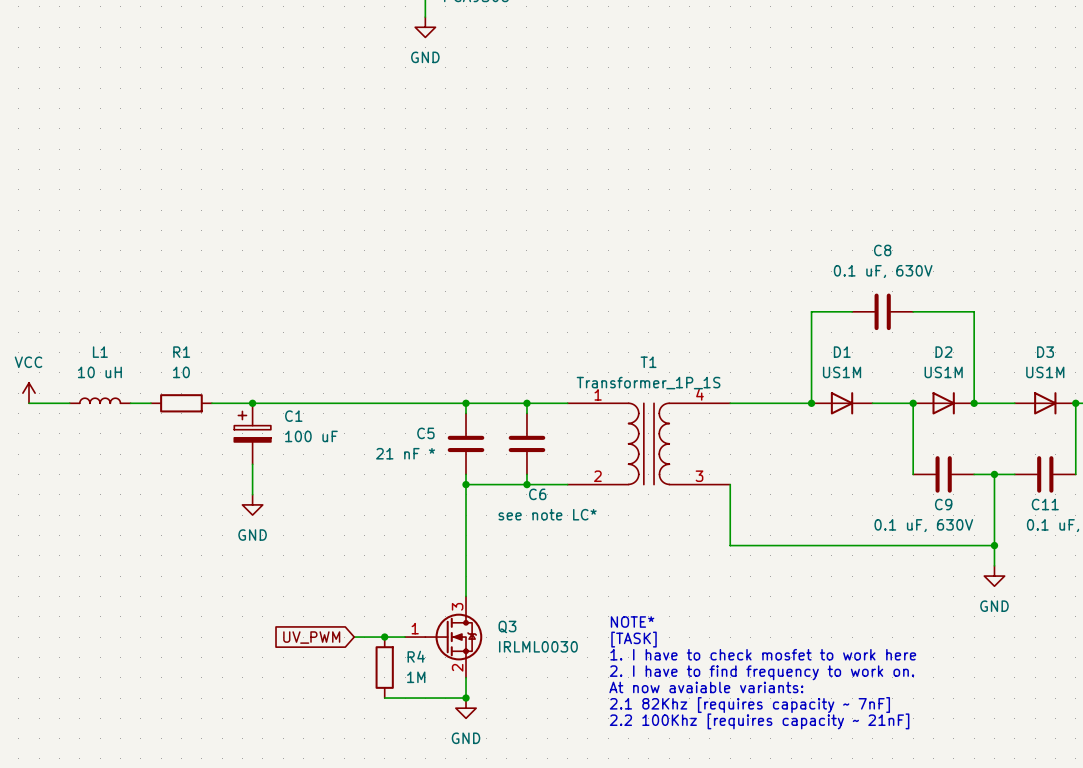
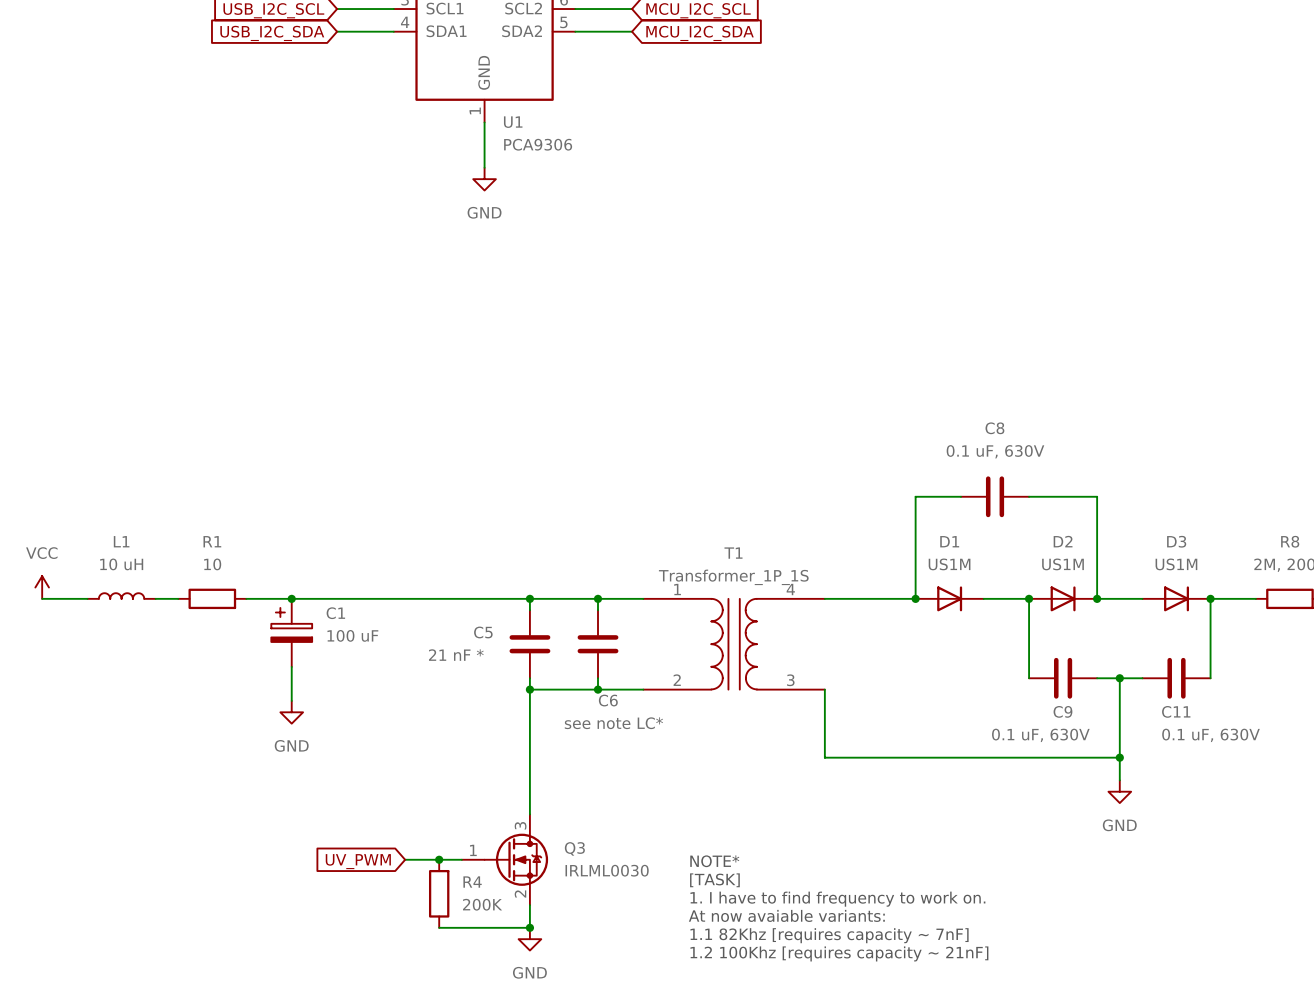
text: NOTE* (632, 622) -> none
text: [TASK] (634, 639) -> NOTE* (714, 861)
text: 1. I have to check mosfet to work here (763, 654) -> [TASK] (714, 880)
text: 2. I have to find frequency to work on. (762, 672) -> 1. I have to find frequency to work on. (837, 899)
R4 value: 1M (416, 677) -> 200K (482, 904)
text: 2.1 82Khz [requires capacity ~ 7nF] (749, 705) -> 1.1 82Khz [requires capacity ~ 7nF] (829, 935)
text: 2.2 100Khz [requires capacity ~ 21nF] (759, 721) -> 1.2 100Khz [requires capacity ~ 21nF] (839, 953)

